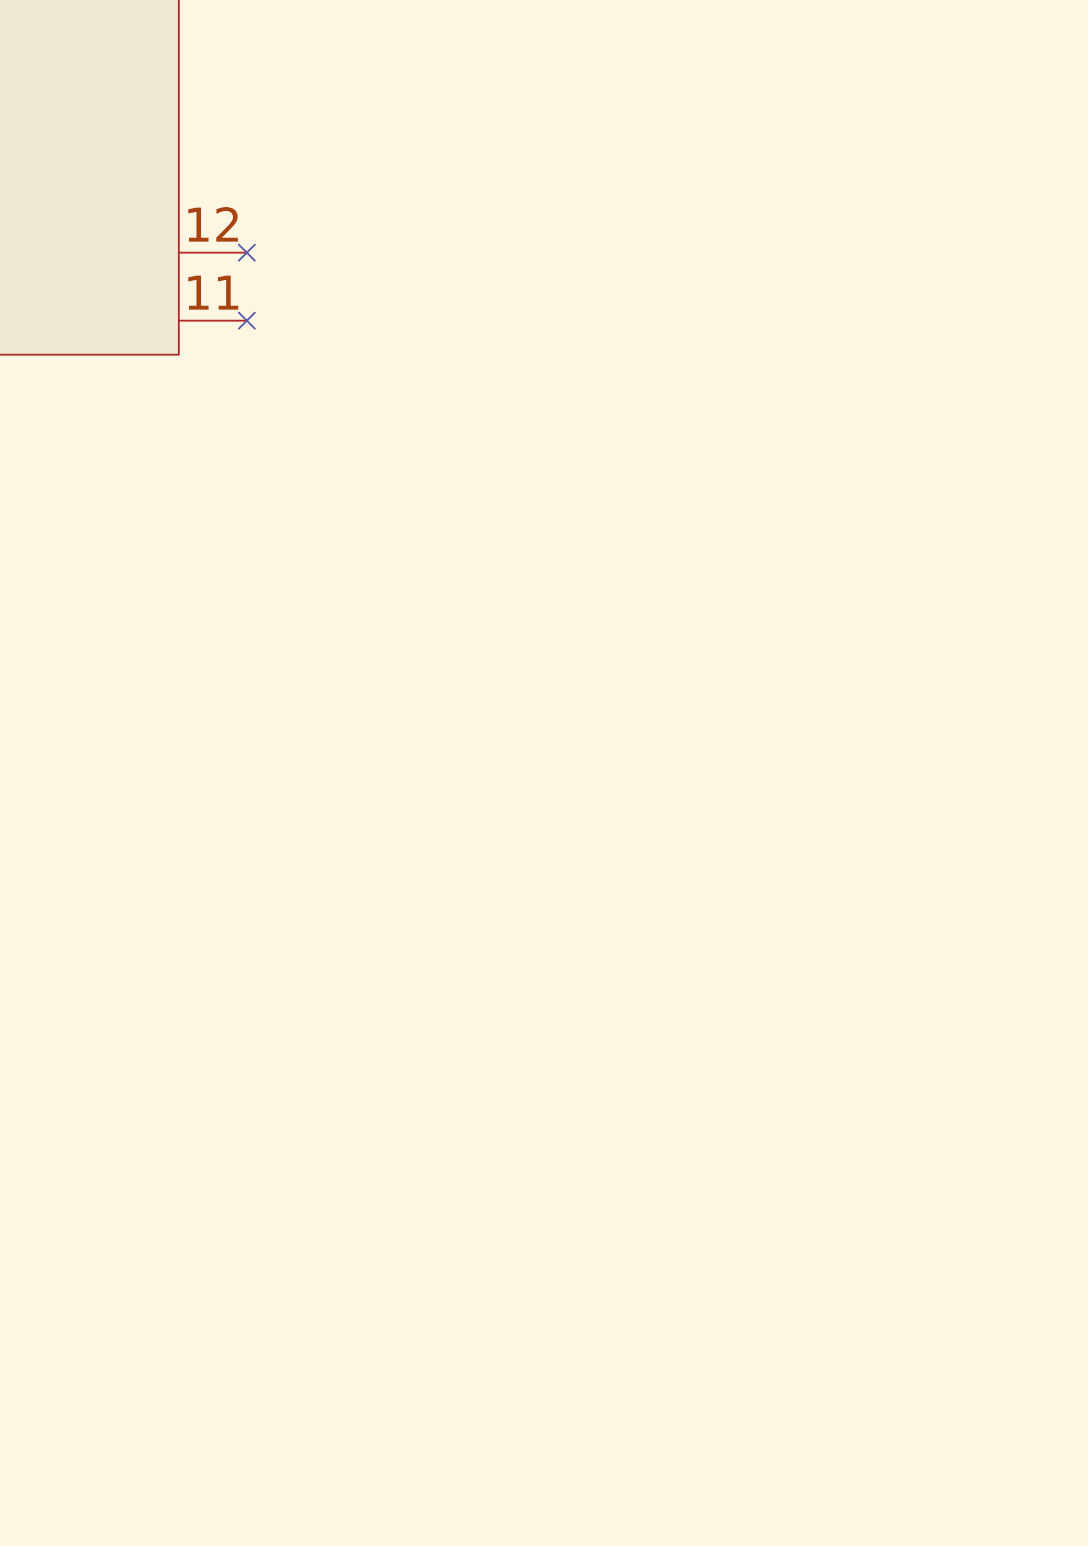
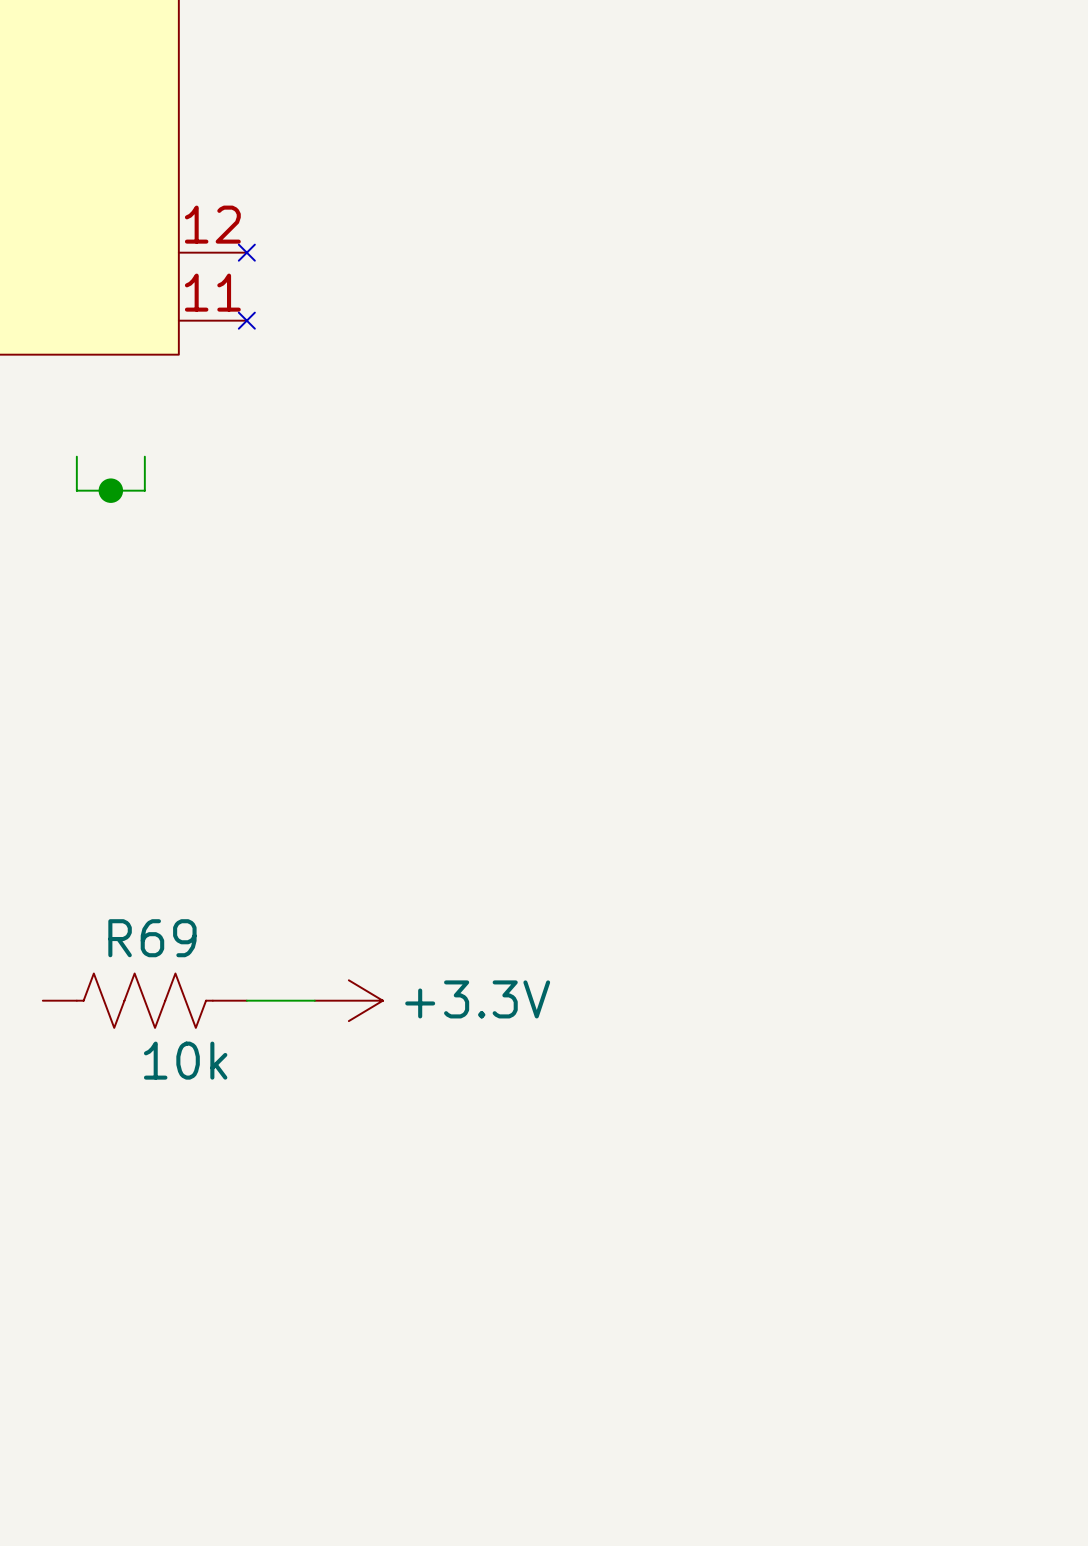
wire: none -> (76, 456) (76, 490) (144, 490) (144, 456)
junction: none -> (110, 490)
R69: none -> 10k (144, 1000)
wire: none -> (246, 1000) (314, 1000)
power symbol: none -> +3.3V (348, 1000)

